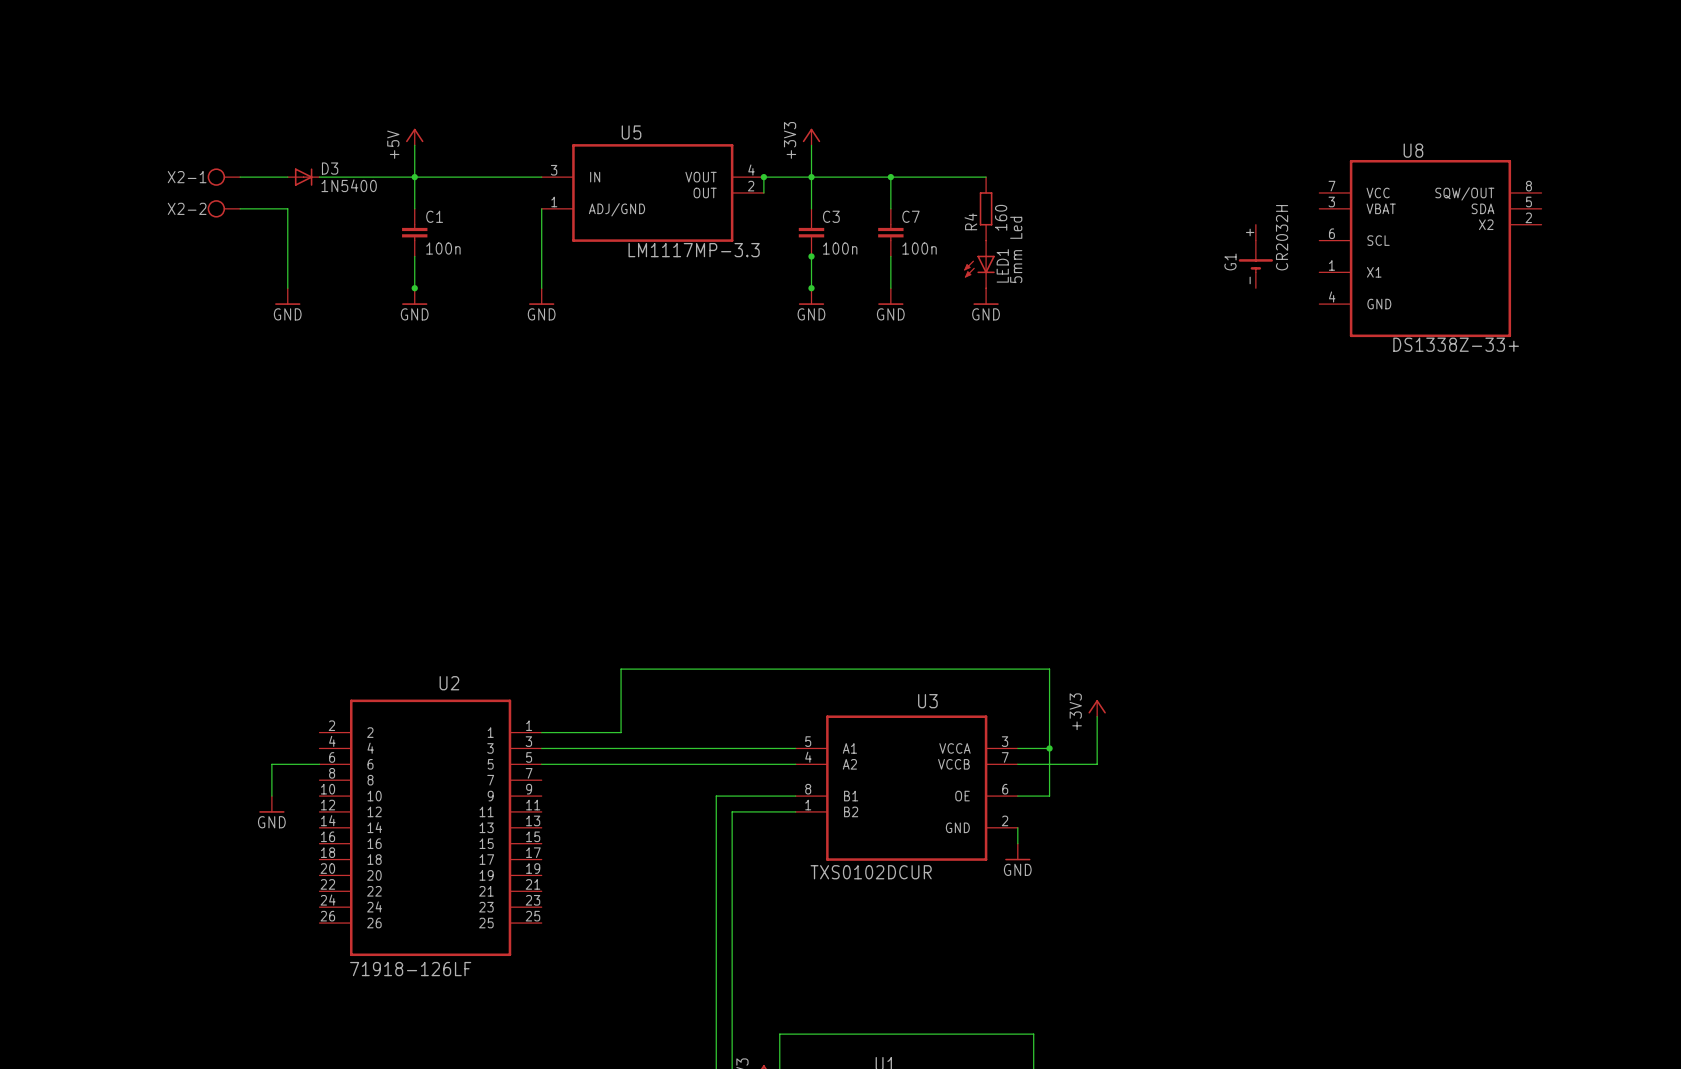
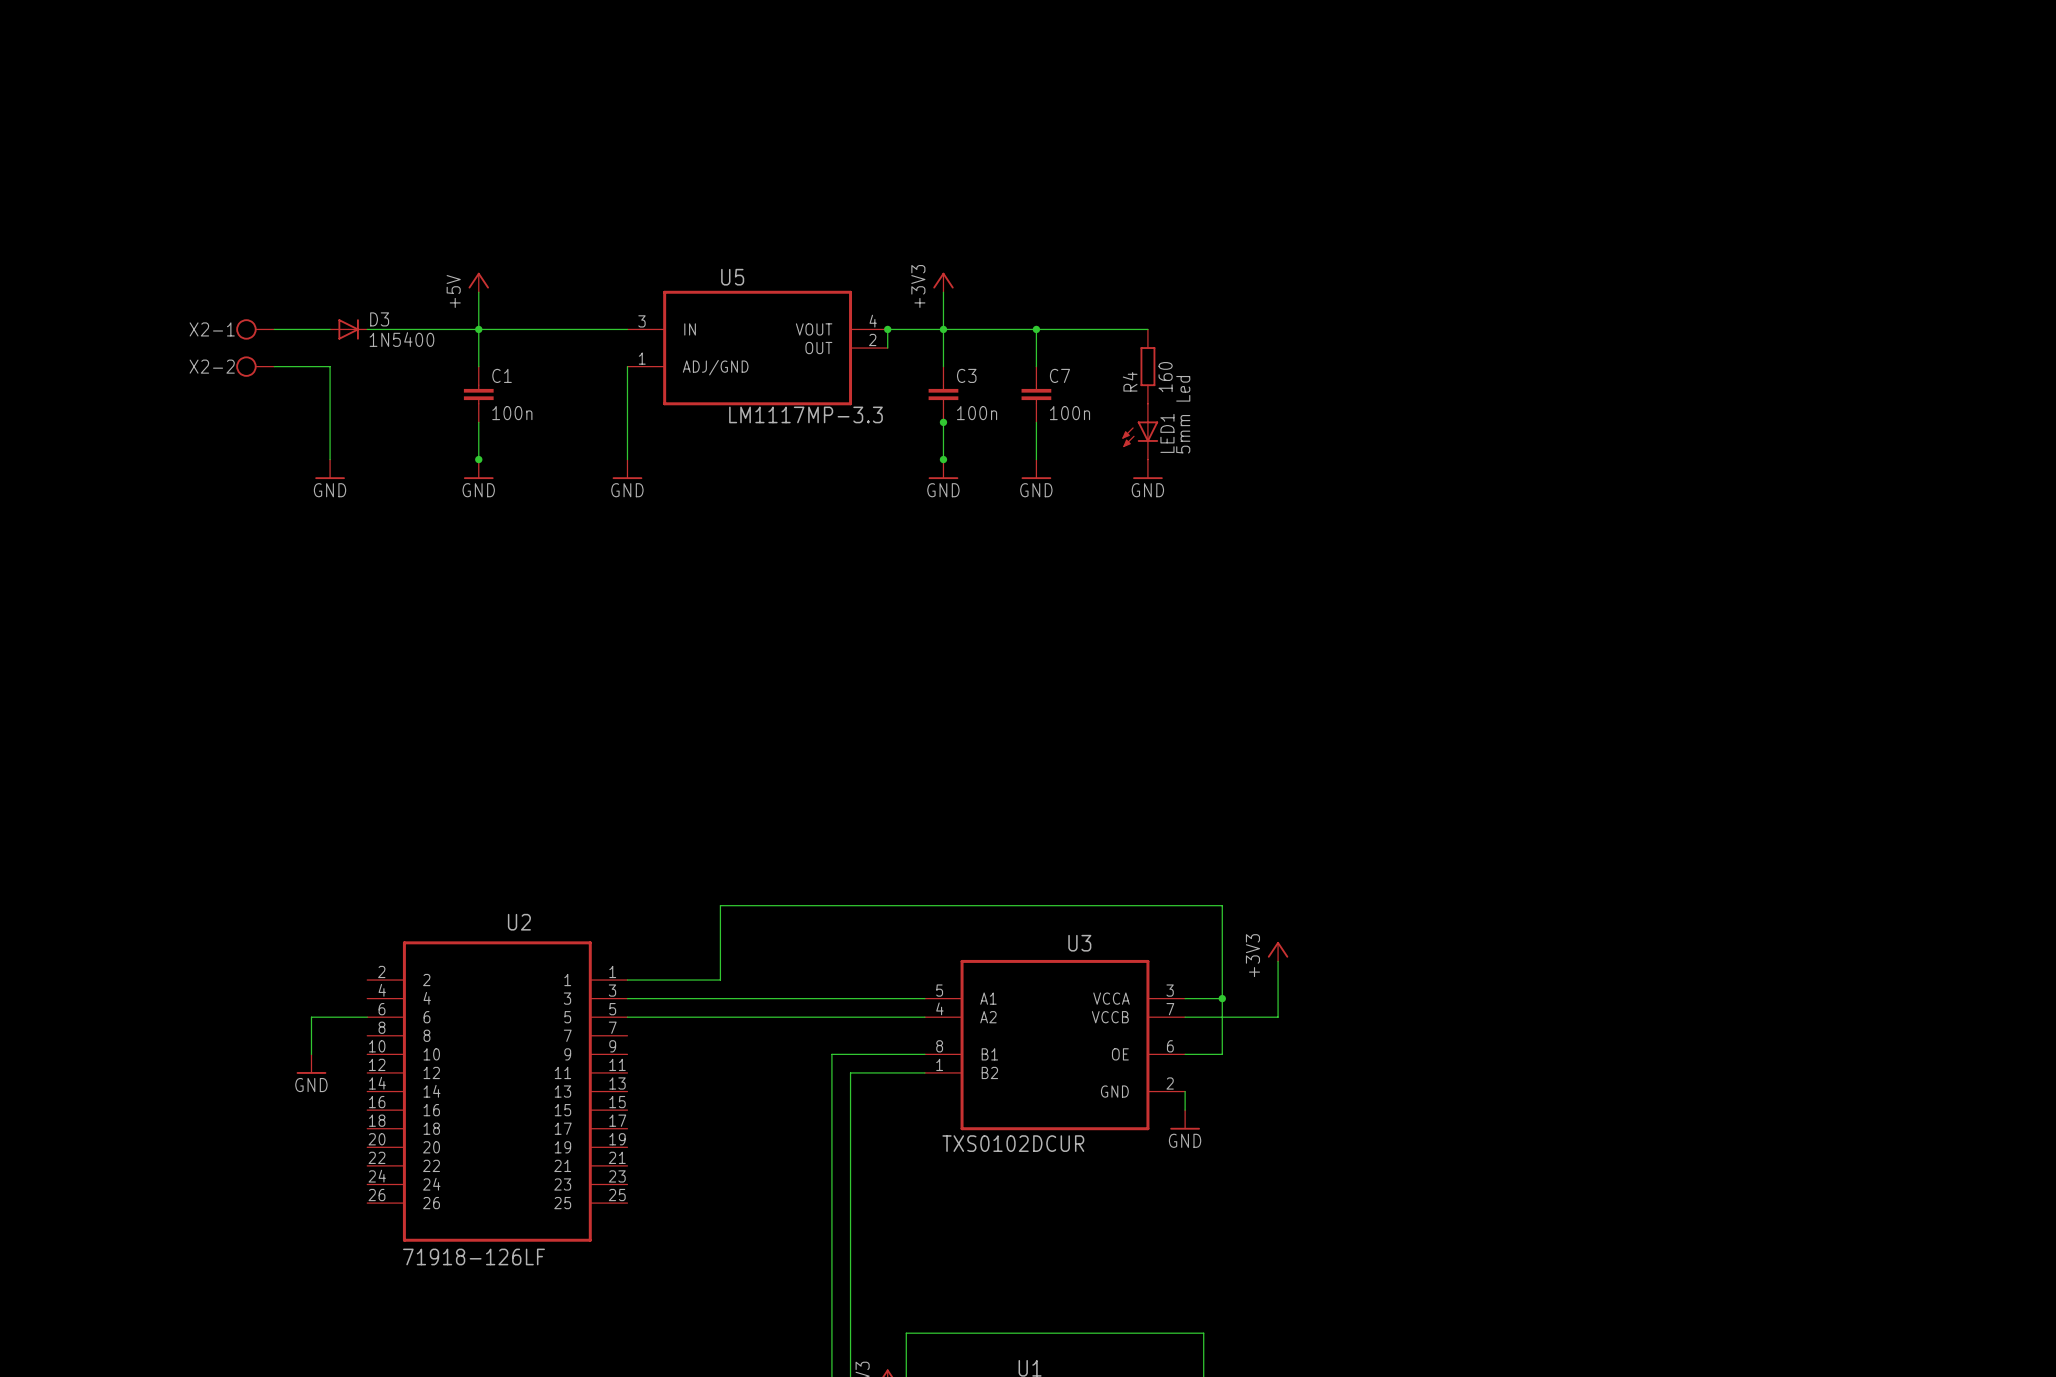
U8: DS1338Z-33+ (1430, 248) -> none
G1: CR2032H (1255, 256) -> none

